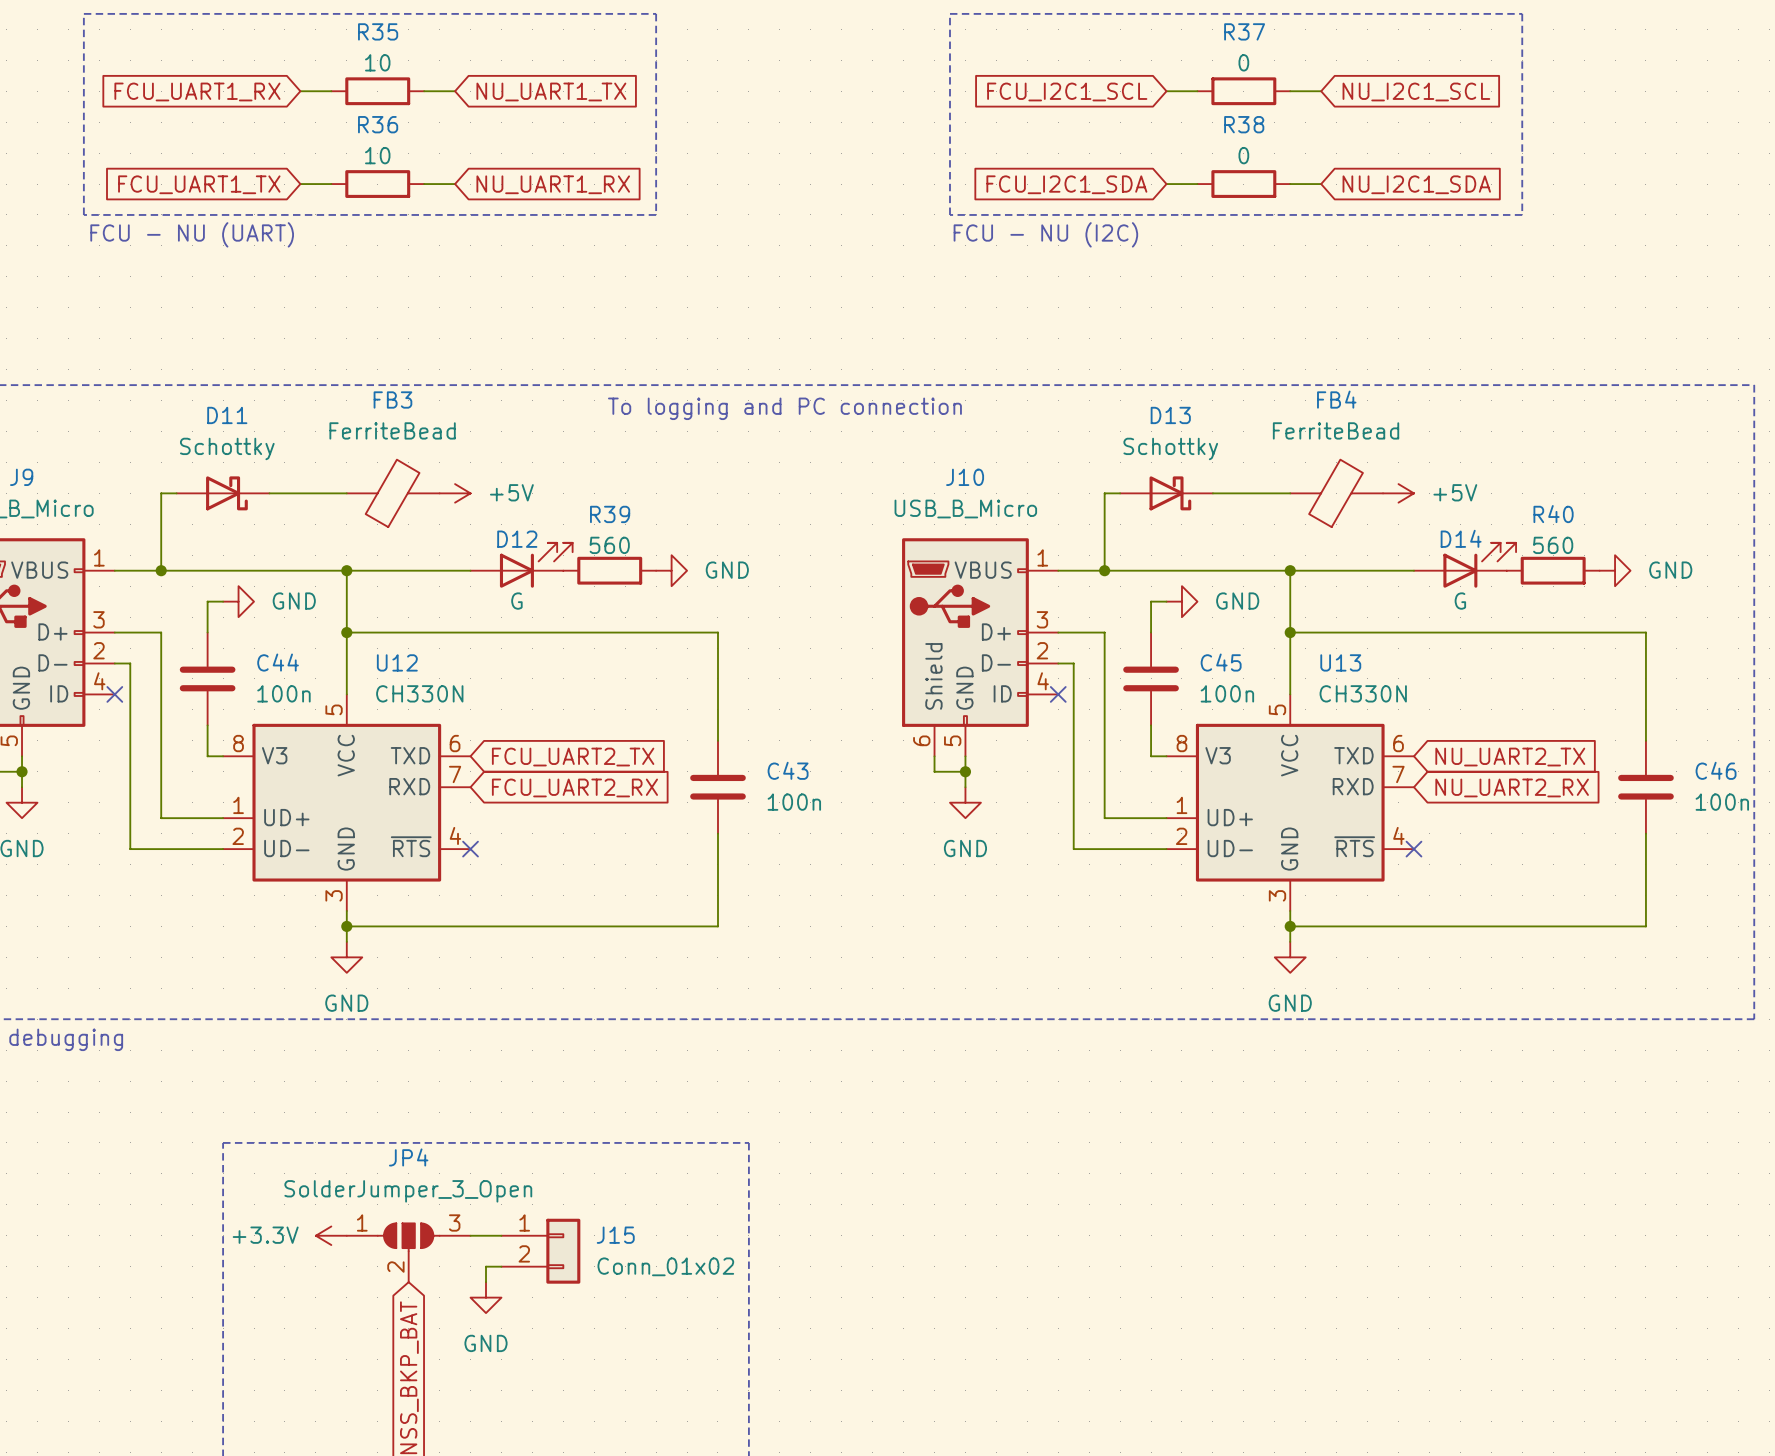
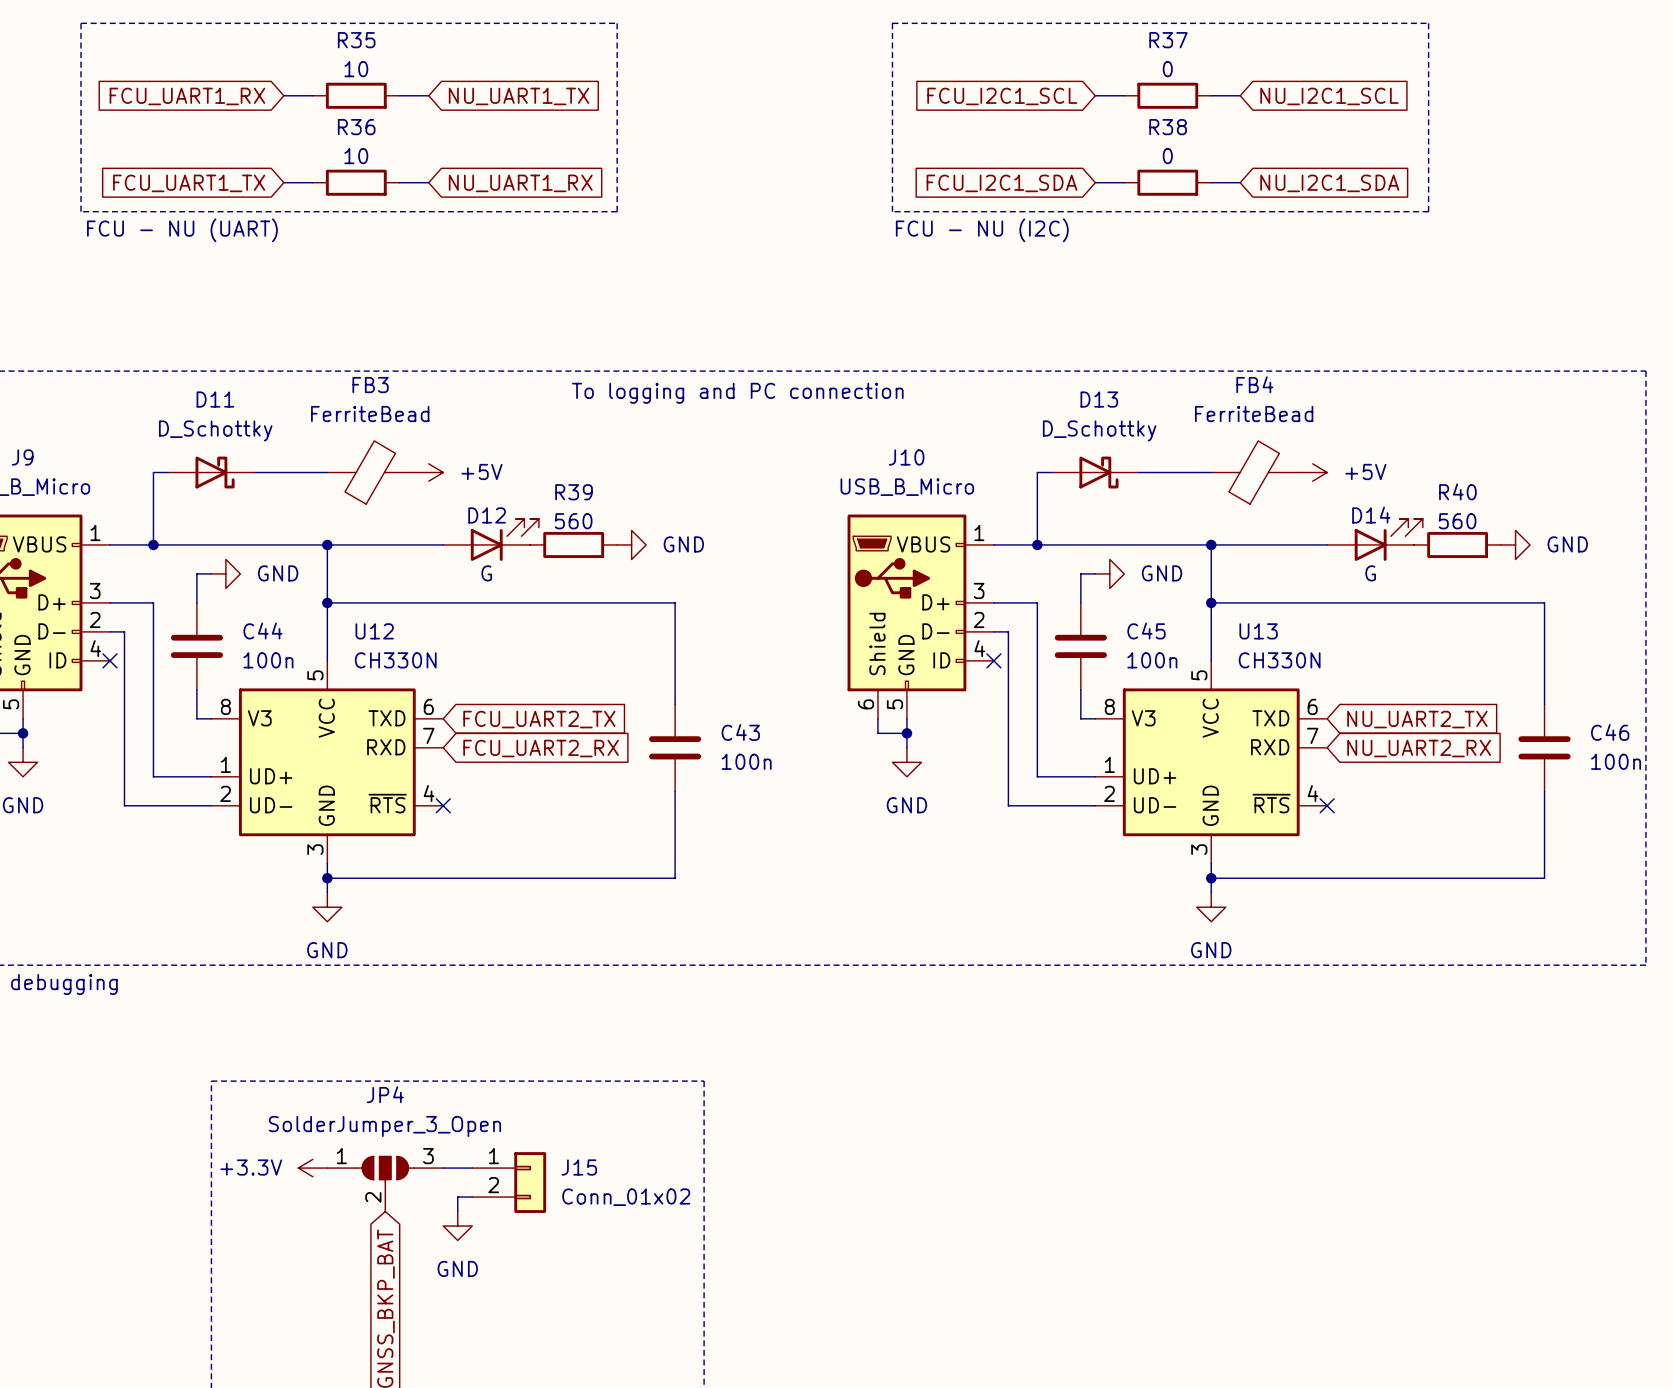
D11 value: Schottky (227, 448) -> D_Schottky (215, 430)
D13 value: Schottky (1170, 448) -> D_Schottky (1099, 430)

